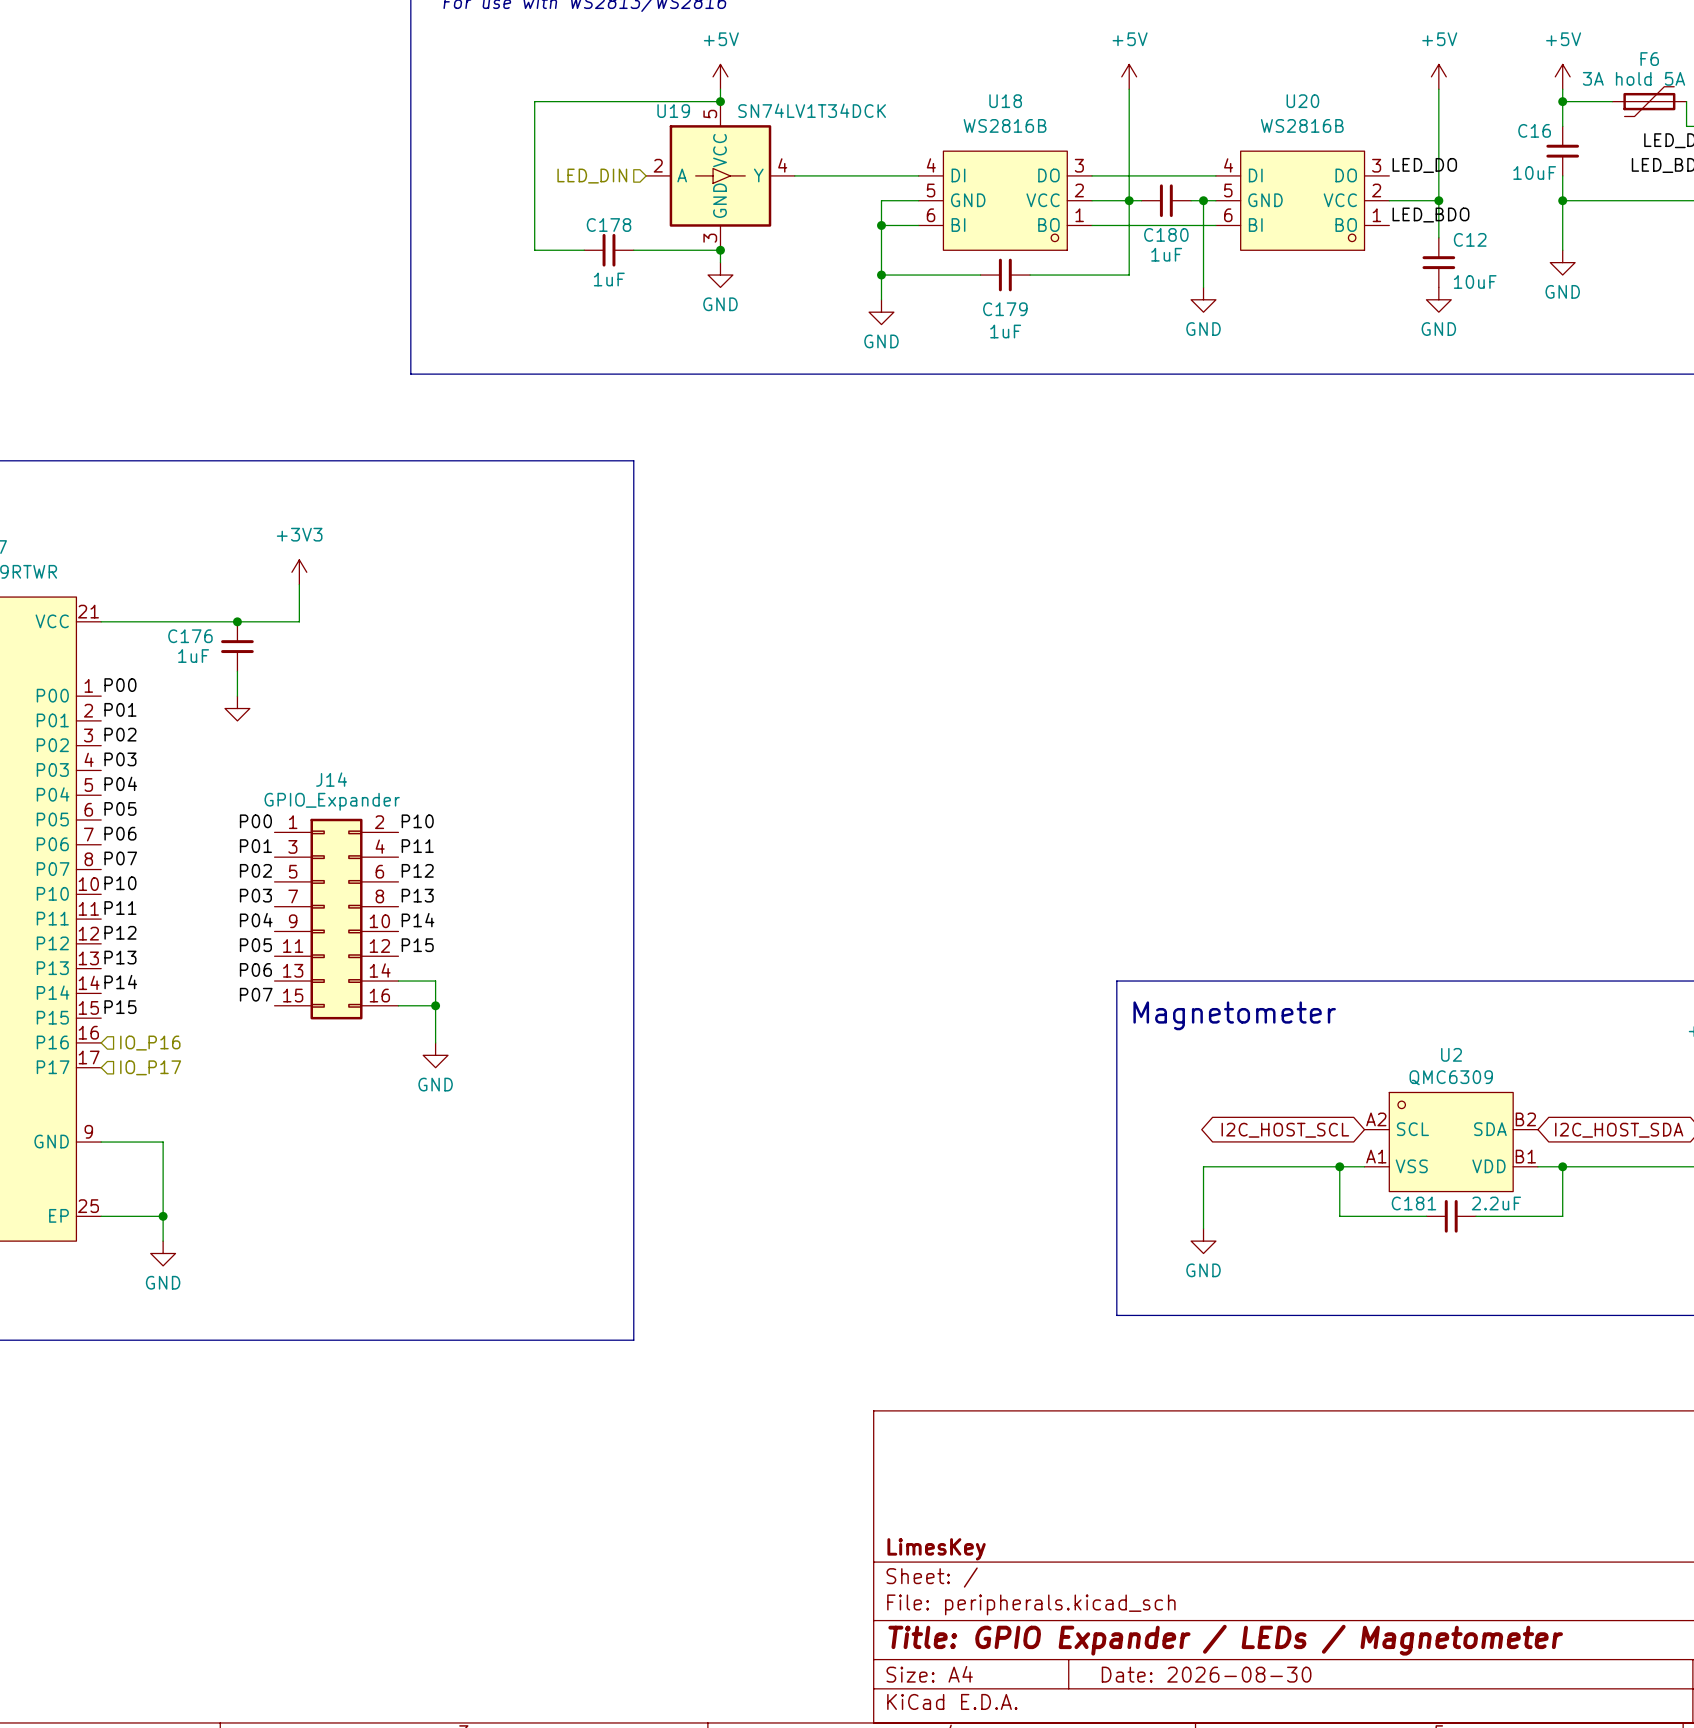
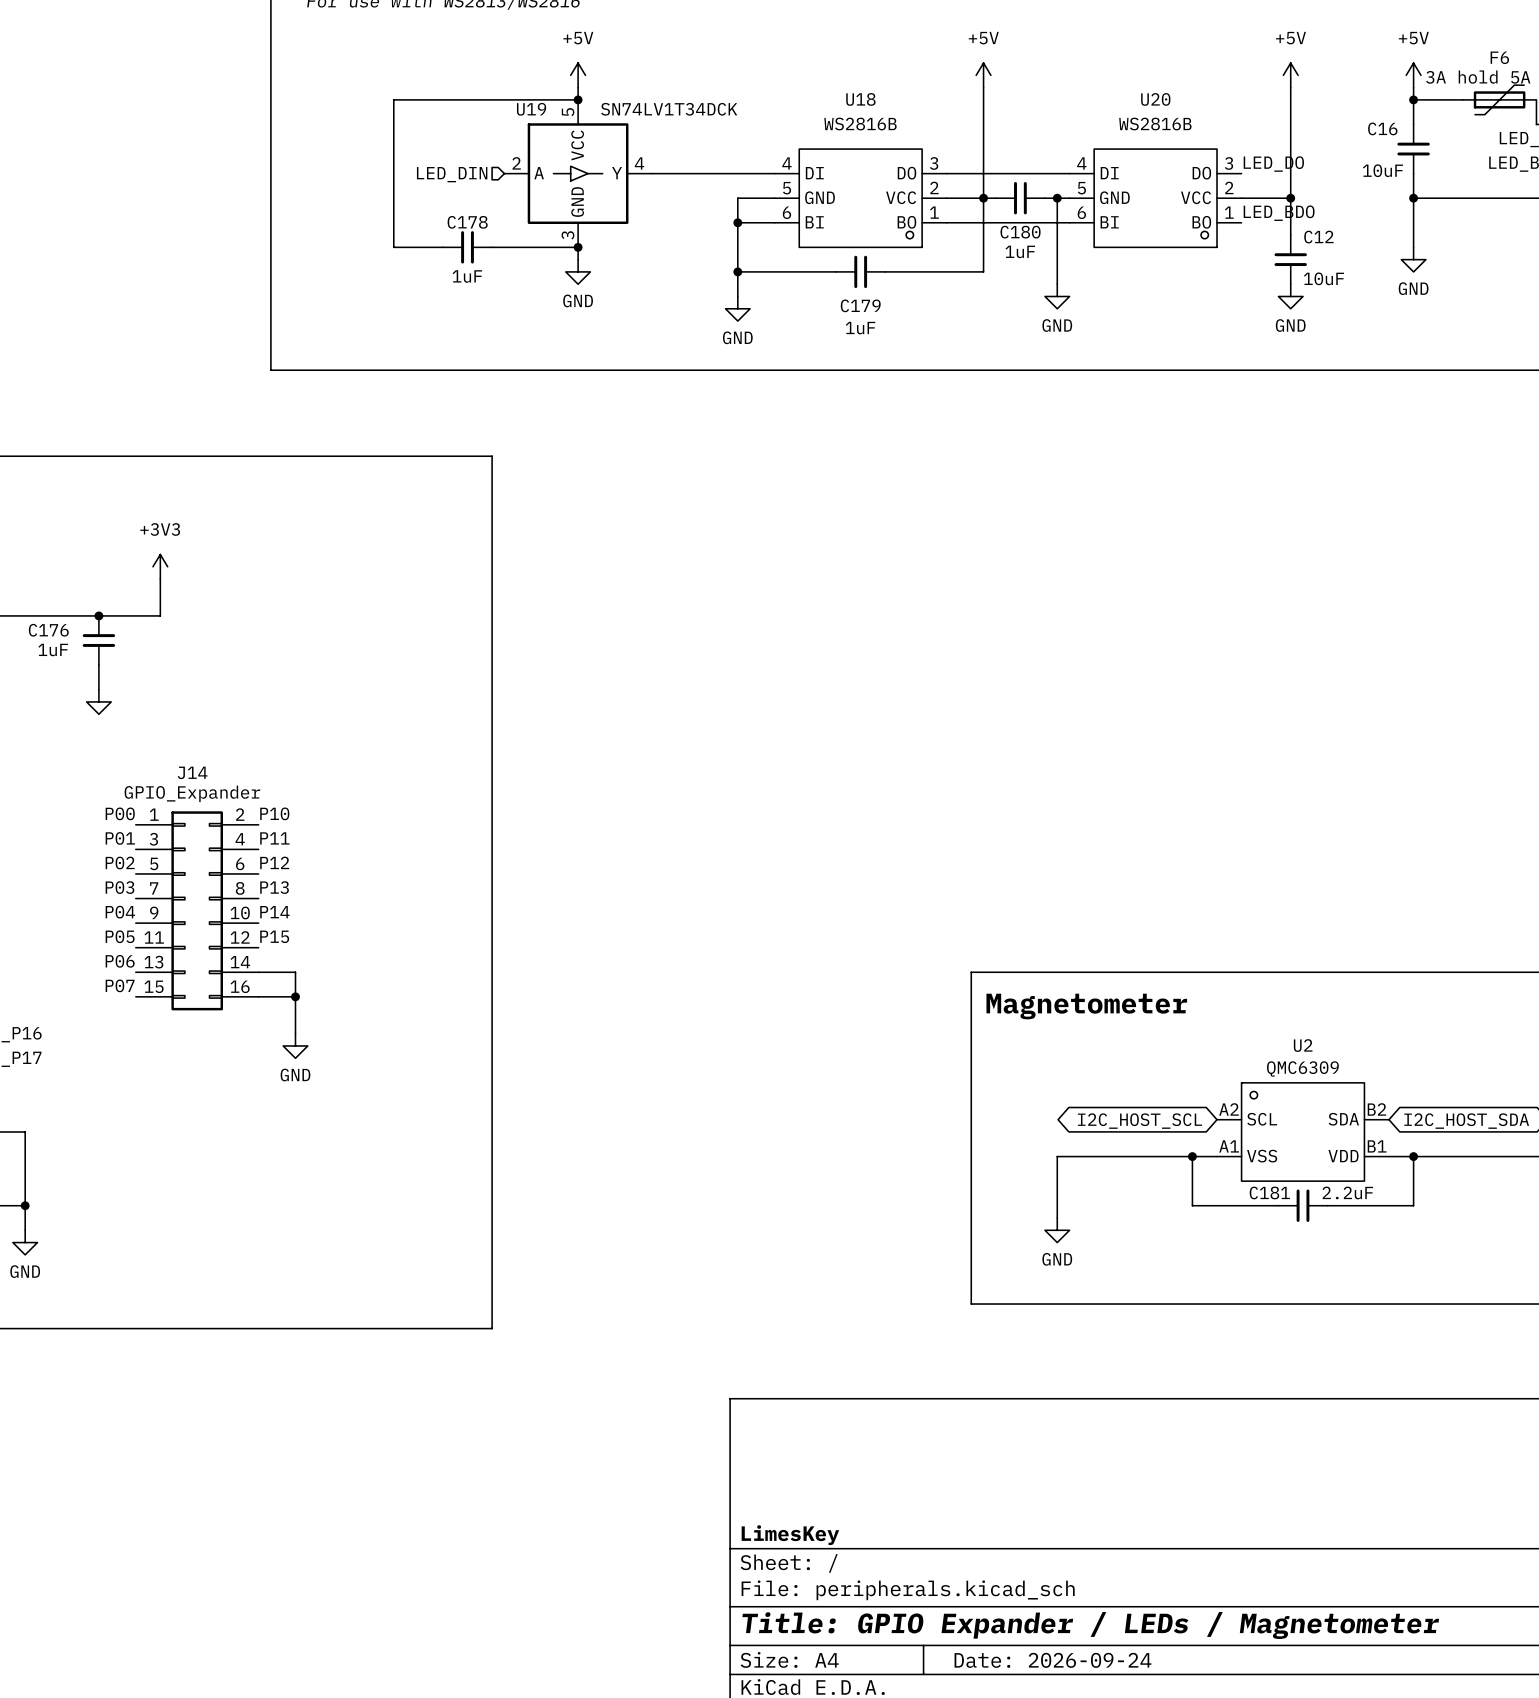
title block: Date: 2026-08-30 (1206, 1674) -> Date: 2026-09-24 (1052, 1660)

